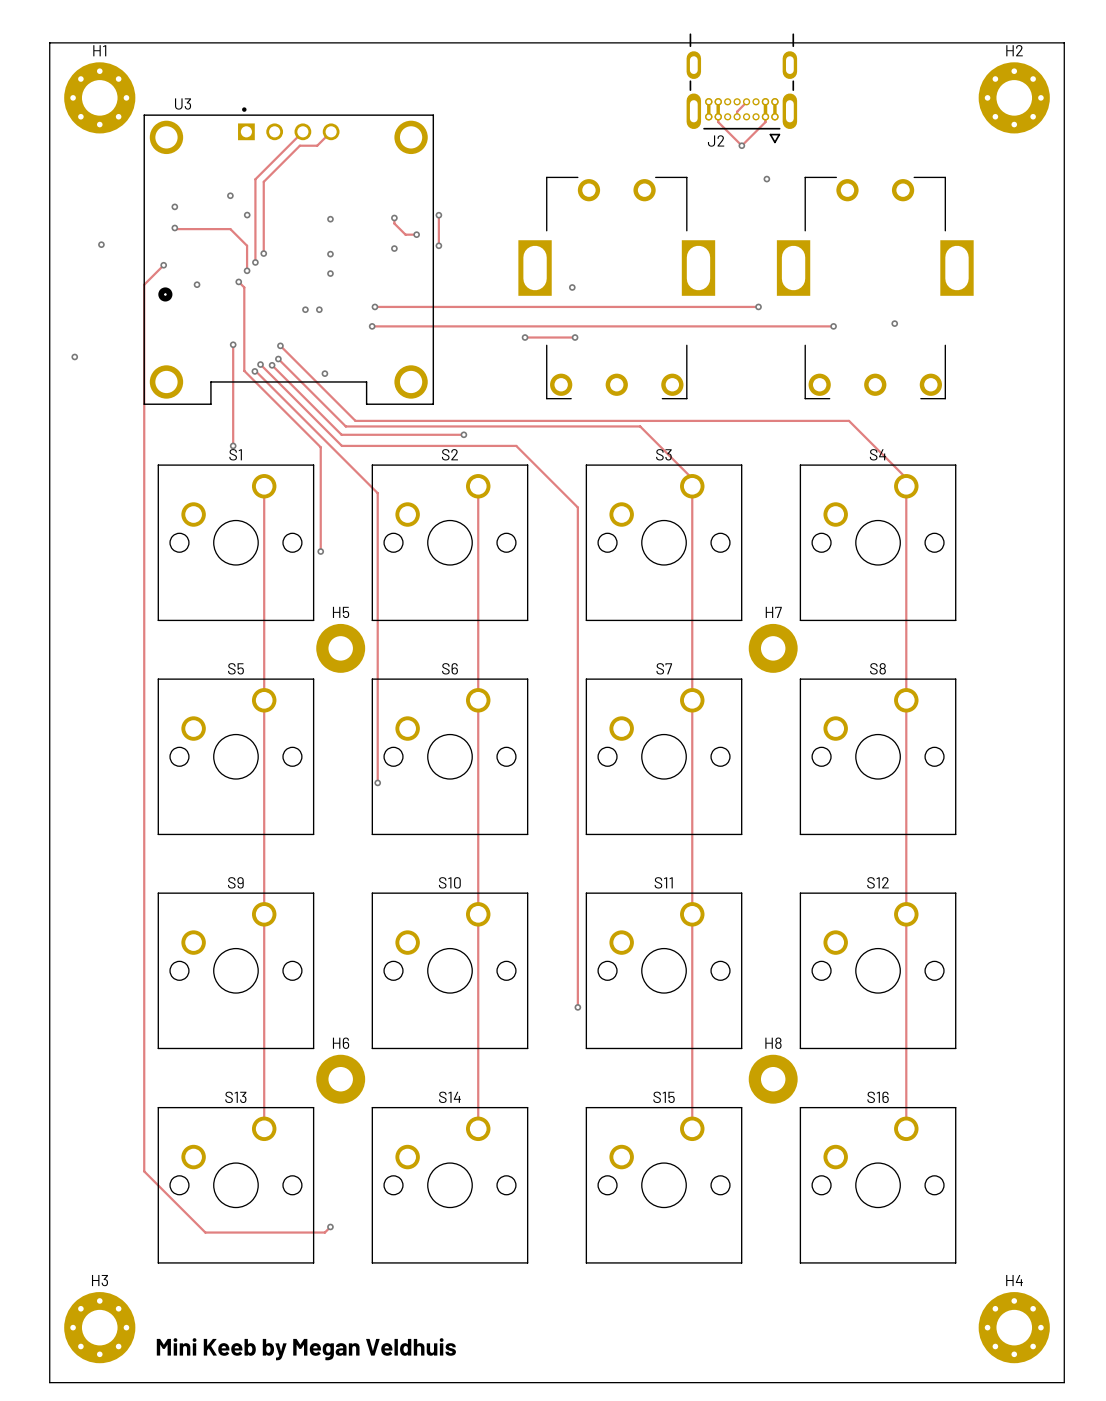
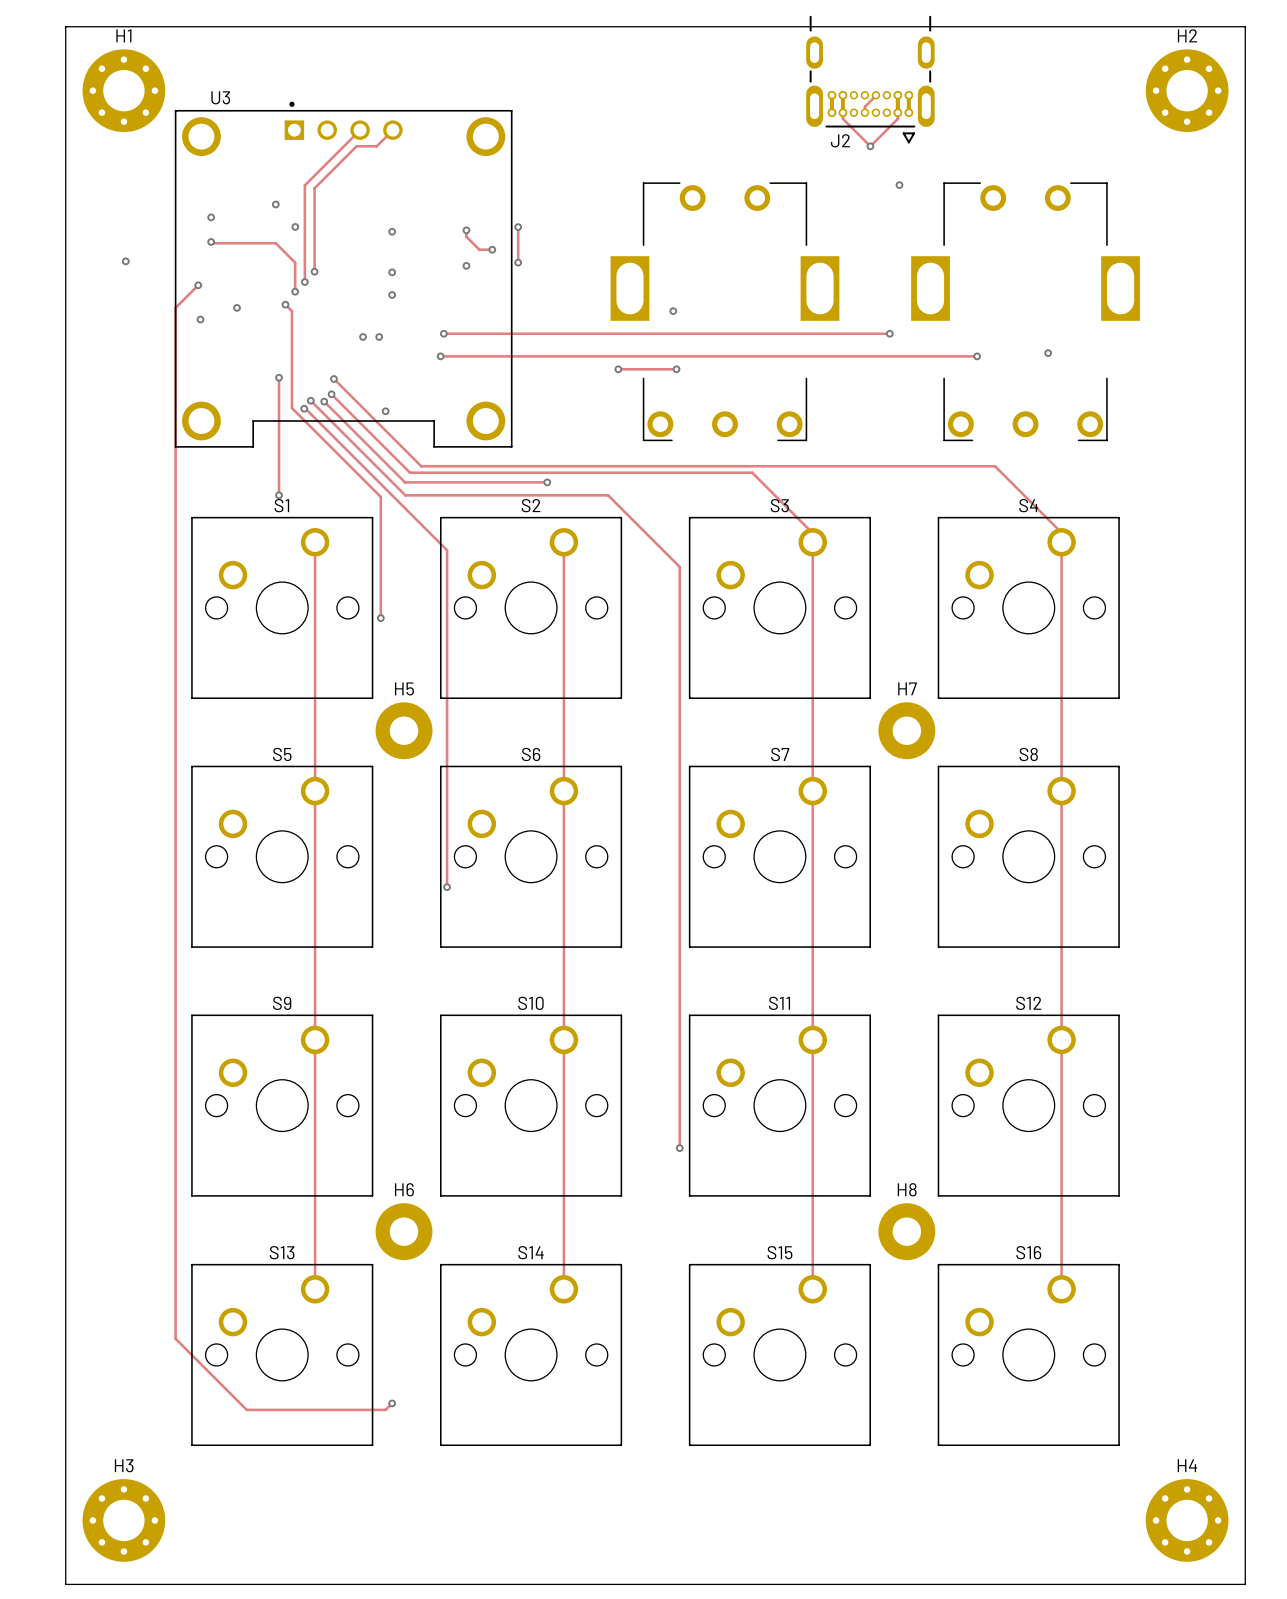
part: (165, 294) -> none
via: (74, 356) -> none
text: Mini Keeb by Megan Veldhuis (306, 1349) -> none

